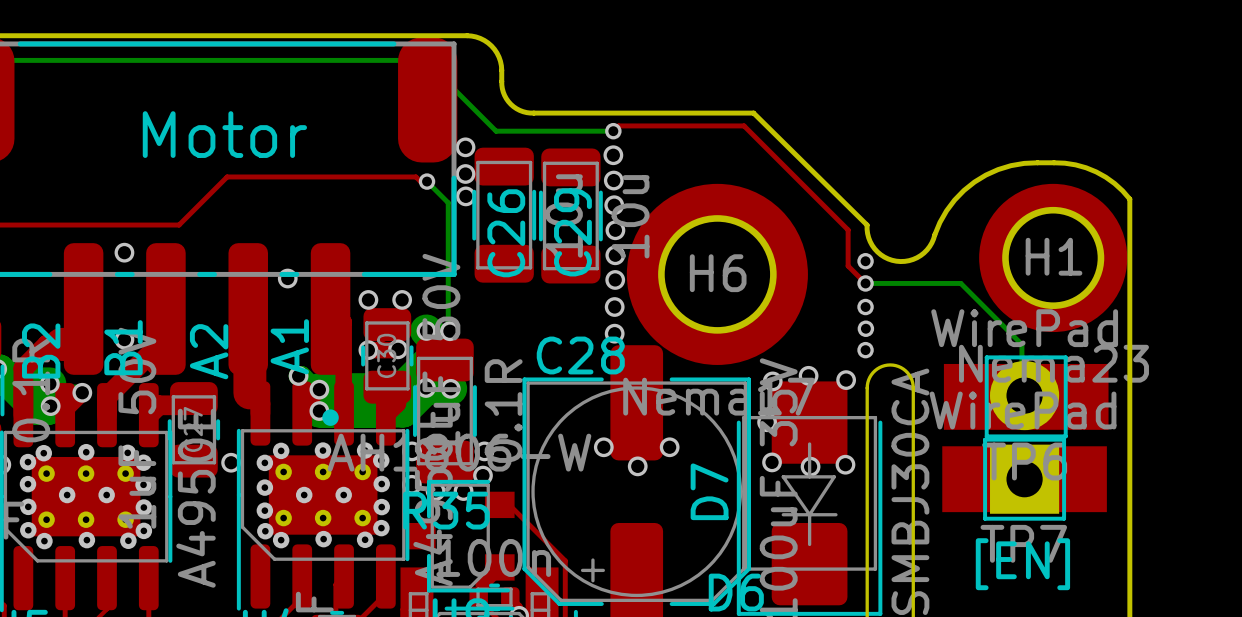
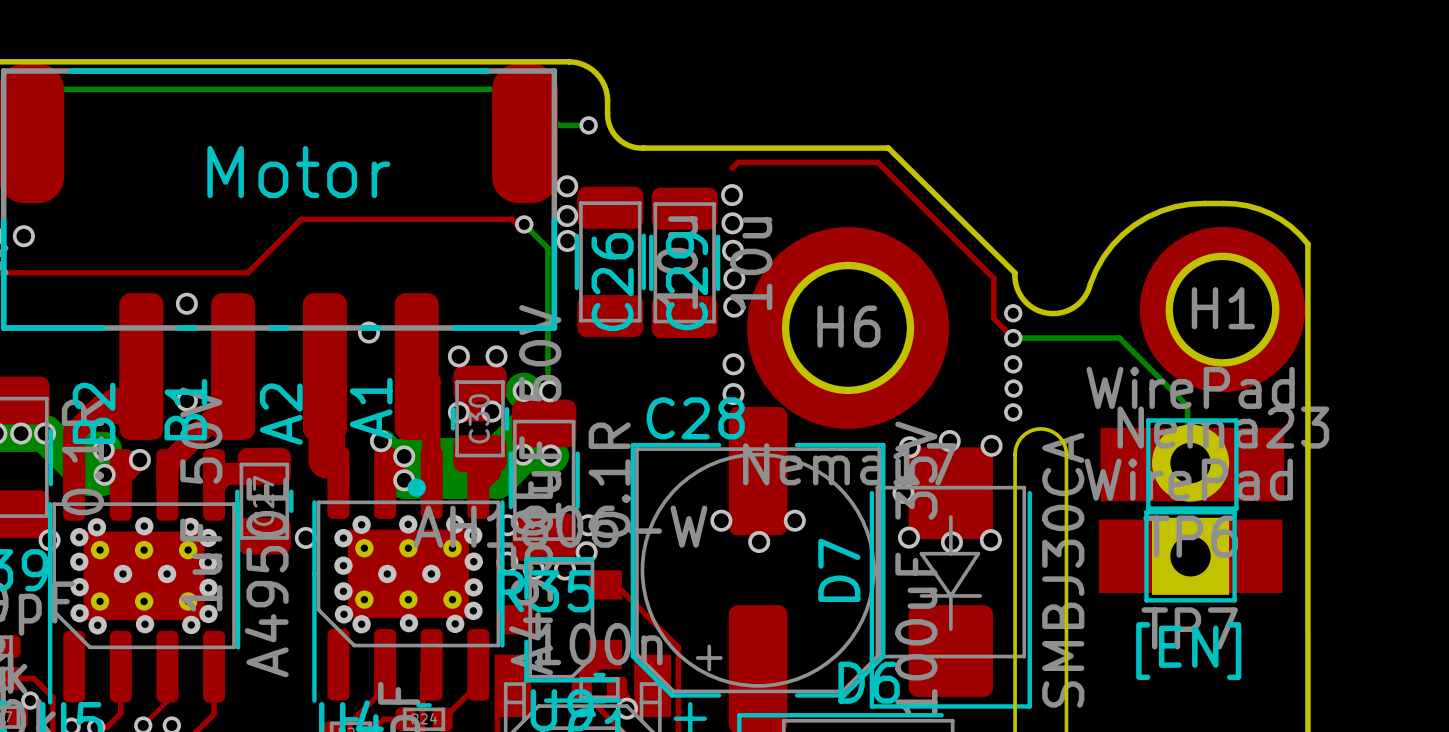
bottom track: (457, 92) (496, 131) (613, 131) -> (558, 125) (588, 125)
via position: (613, 131) -> (588, 125)
via: (615, 279) -> none

